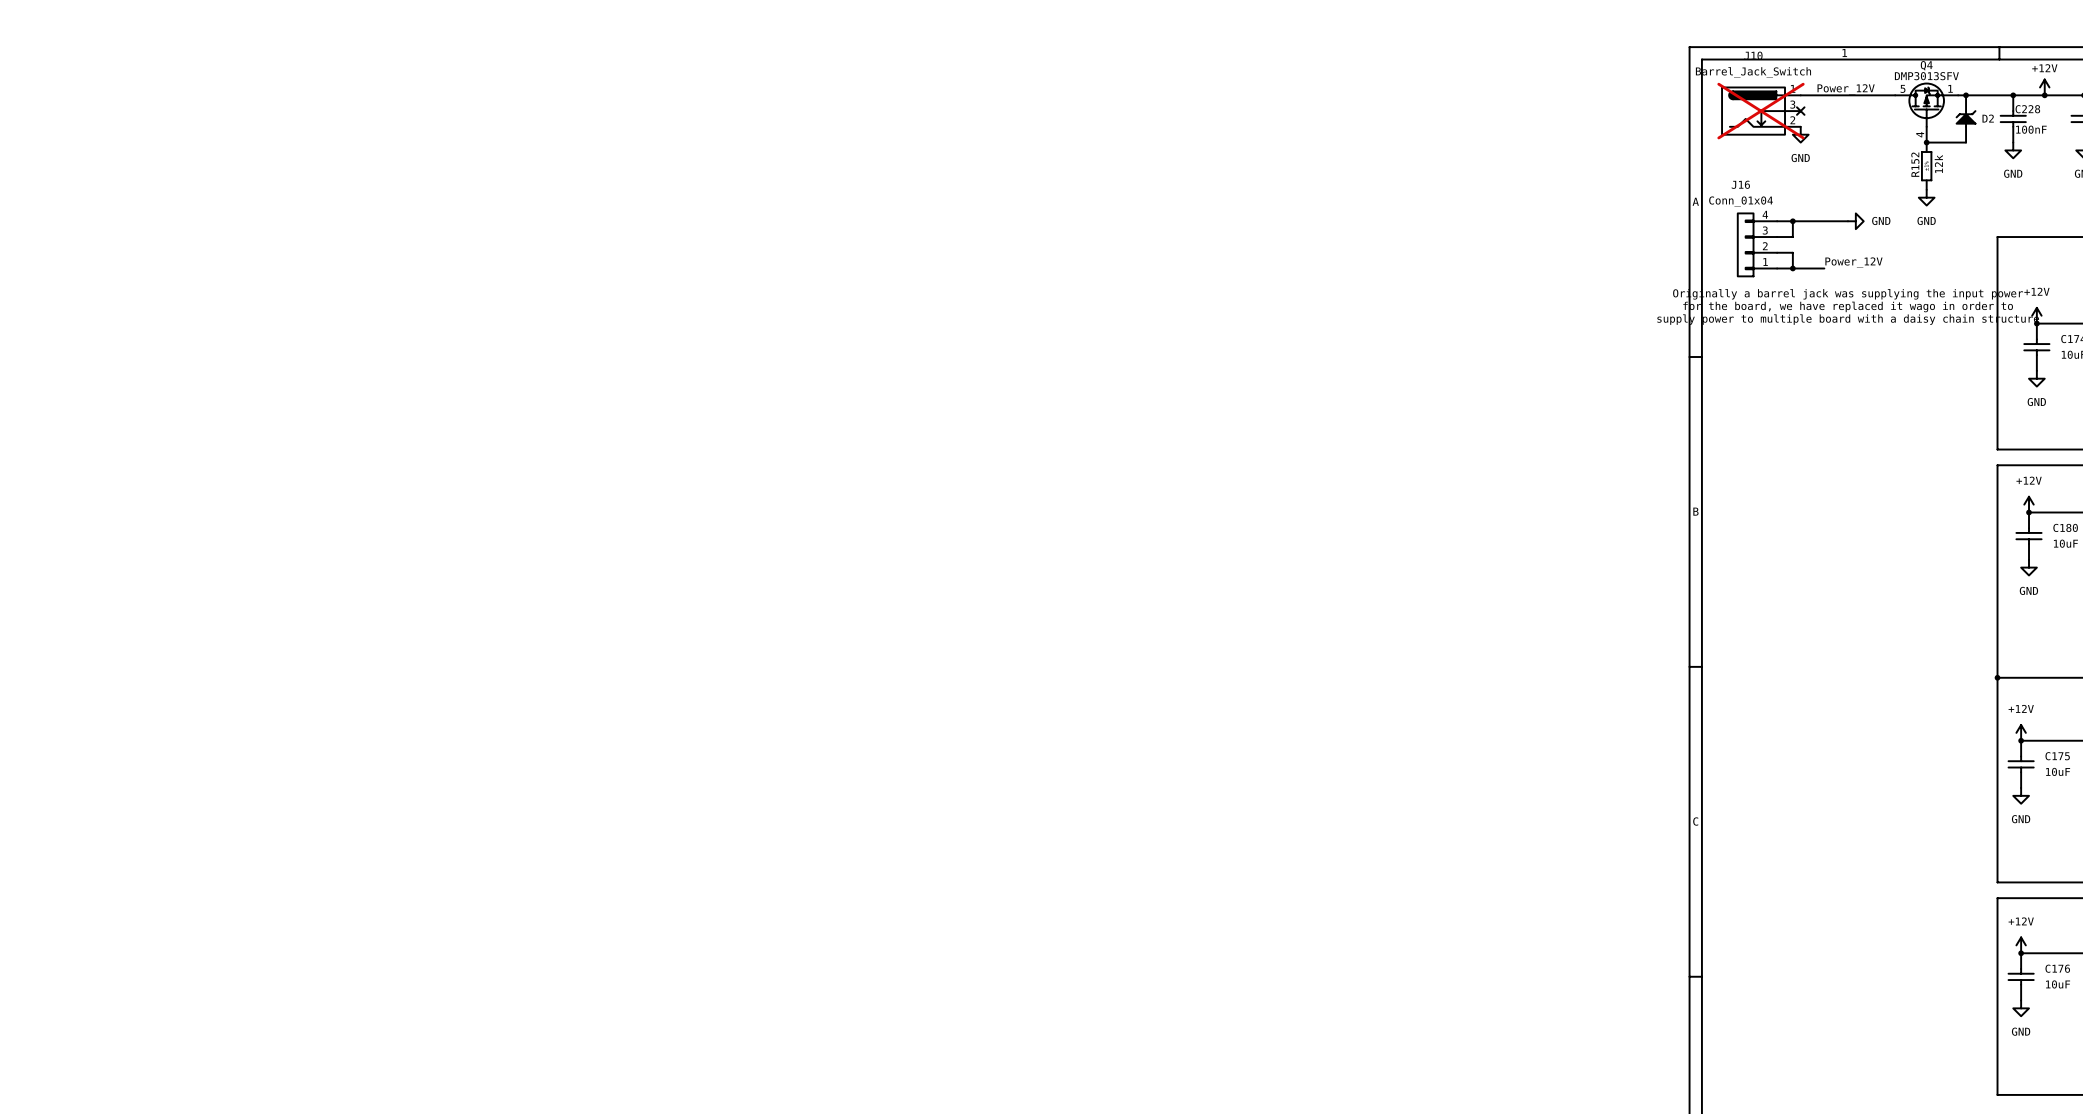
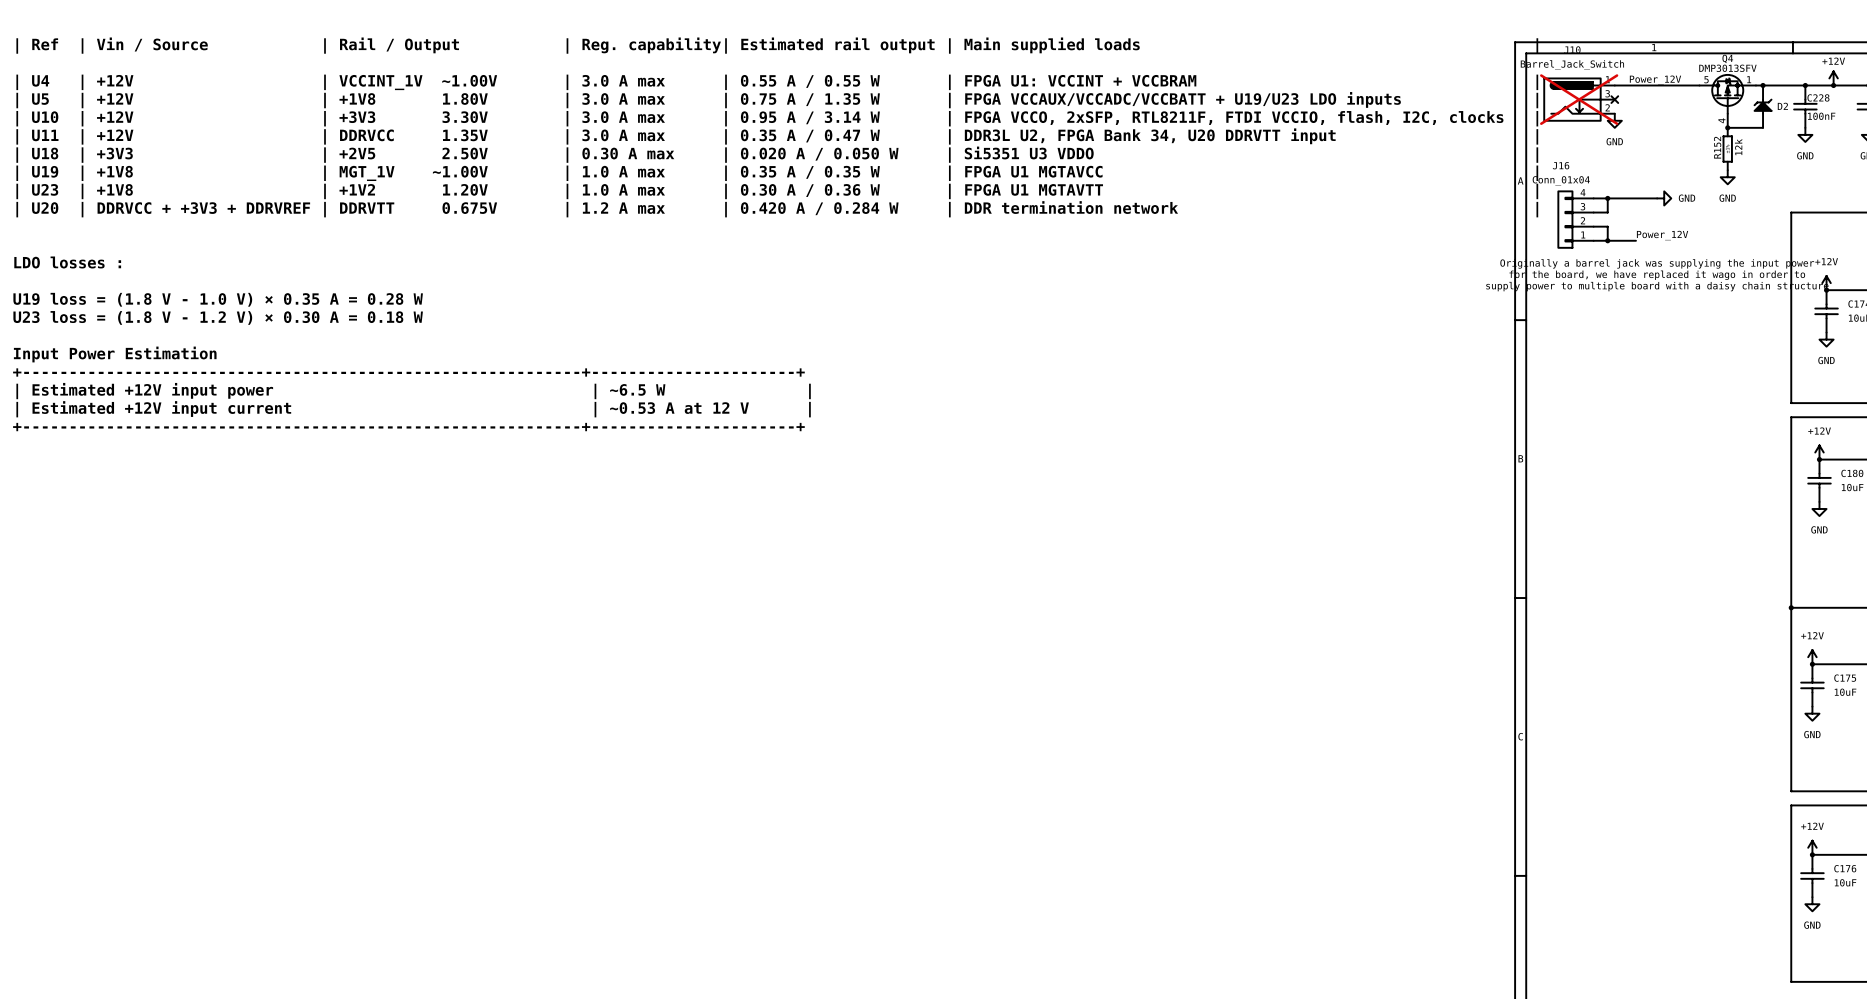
text: none -> | Ref | Vin / Source | Rail / Output | Reg. capability| Estimated rail output | Main supplied loads | (777, 45)
text: none -> | U4 | +12V | VCCINT_1V ~1.00V | 3.0 A max | 0.55 A / 0.55 W | FPGA U1: VCCINT + VCCBRAM | (777, 82)
text: none -> | U5 | +12V | +1V8 1.80V | 3.0 A max | 0.75 A / 1.35 W | FPGA VCCAUX/VCCADC/VCCBATT + U19/U23 LDO inputs | (777, 100)
text: none -> | U10 | +12V | +3V3 3.30V | 3.0 A max | 0.95 A / 3.14 W | FPGA VCCO, 2xSFP, RTL8211F, FTDI VCCIO, flash, I2C, clocks | (777, 118)
text: none -> | U11 | +12V | DDRVCC 1.35V | 3.0 A max | 0.35 A / 0.47 W | DDR3L U2, FPGA Bank 34, U20 DDRVTT input | (777, 136)
text: none -> | U18 | +3V3 | +2V5 2.50V | 0.30 A max | 0.020 A / 0.050 W | Si5351 U3 VDDO | (777, 154)
text: none -> | U19 | +1V8 | MGT_1V ~1.00V | 1.0 A max | 0.35 A / 0.35 W | FPGA U1 MGTAVCC | (777, 173)
text: none -> | U23 | +1V8 | +1V2 1.20V | 1.0 A max | 0.30 A / 0.36 W | FPGA U1 MGTAVTT | (777, 191)
text: none -> | U20 | DDRVCC + +3V3 + DDRVREF | DDRVTT 0.675V | 1.2 A max | 0.420 A / 0.284 W | DDR termination network | (777, 209)
text: none -> LDO losses : (67, 262)
text: none -> U19 loss = (1.8 V - 1.0 V) × 0.35 A = 0.28 W (218, 299)
text: none -> U23 loss = (1.8 V - 1.2 V) × 0.30 A = 0.18 W (218, 317)
text: none -> Input Power Estimation (115, 354)
text: none -> +------------------------------------------------------------+----------------------+ (408, 372)
text: none -> | Estimated +12V input power | ~6.5 W | (413, 391)
text: none -> | Estimated +12V input current | ~0.53 A at 12 V | (413, 409)
text: none -> +------------------------------------------------------------+----------------------+ (408, 427)

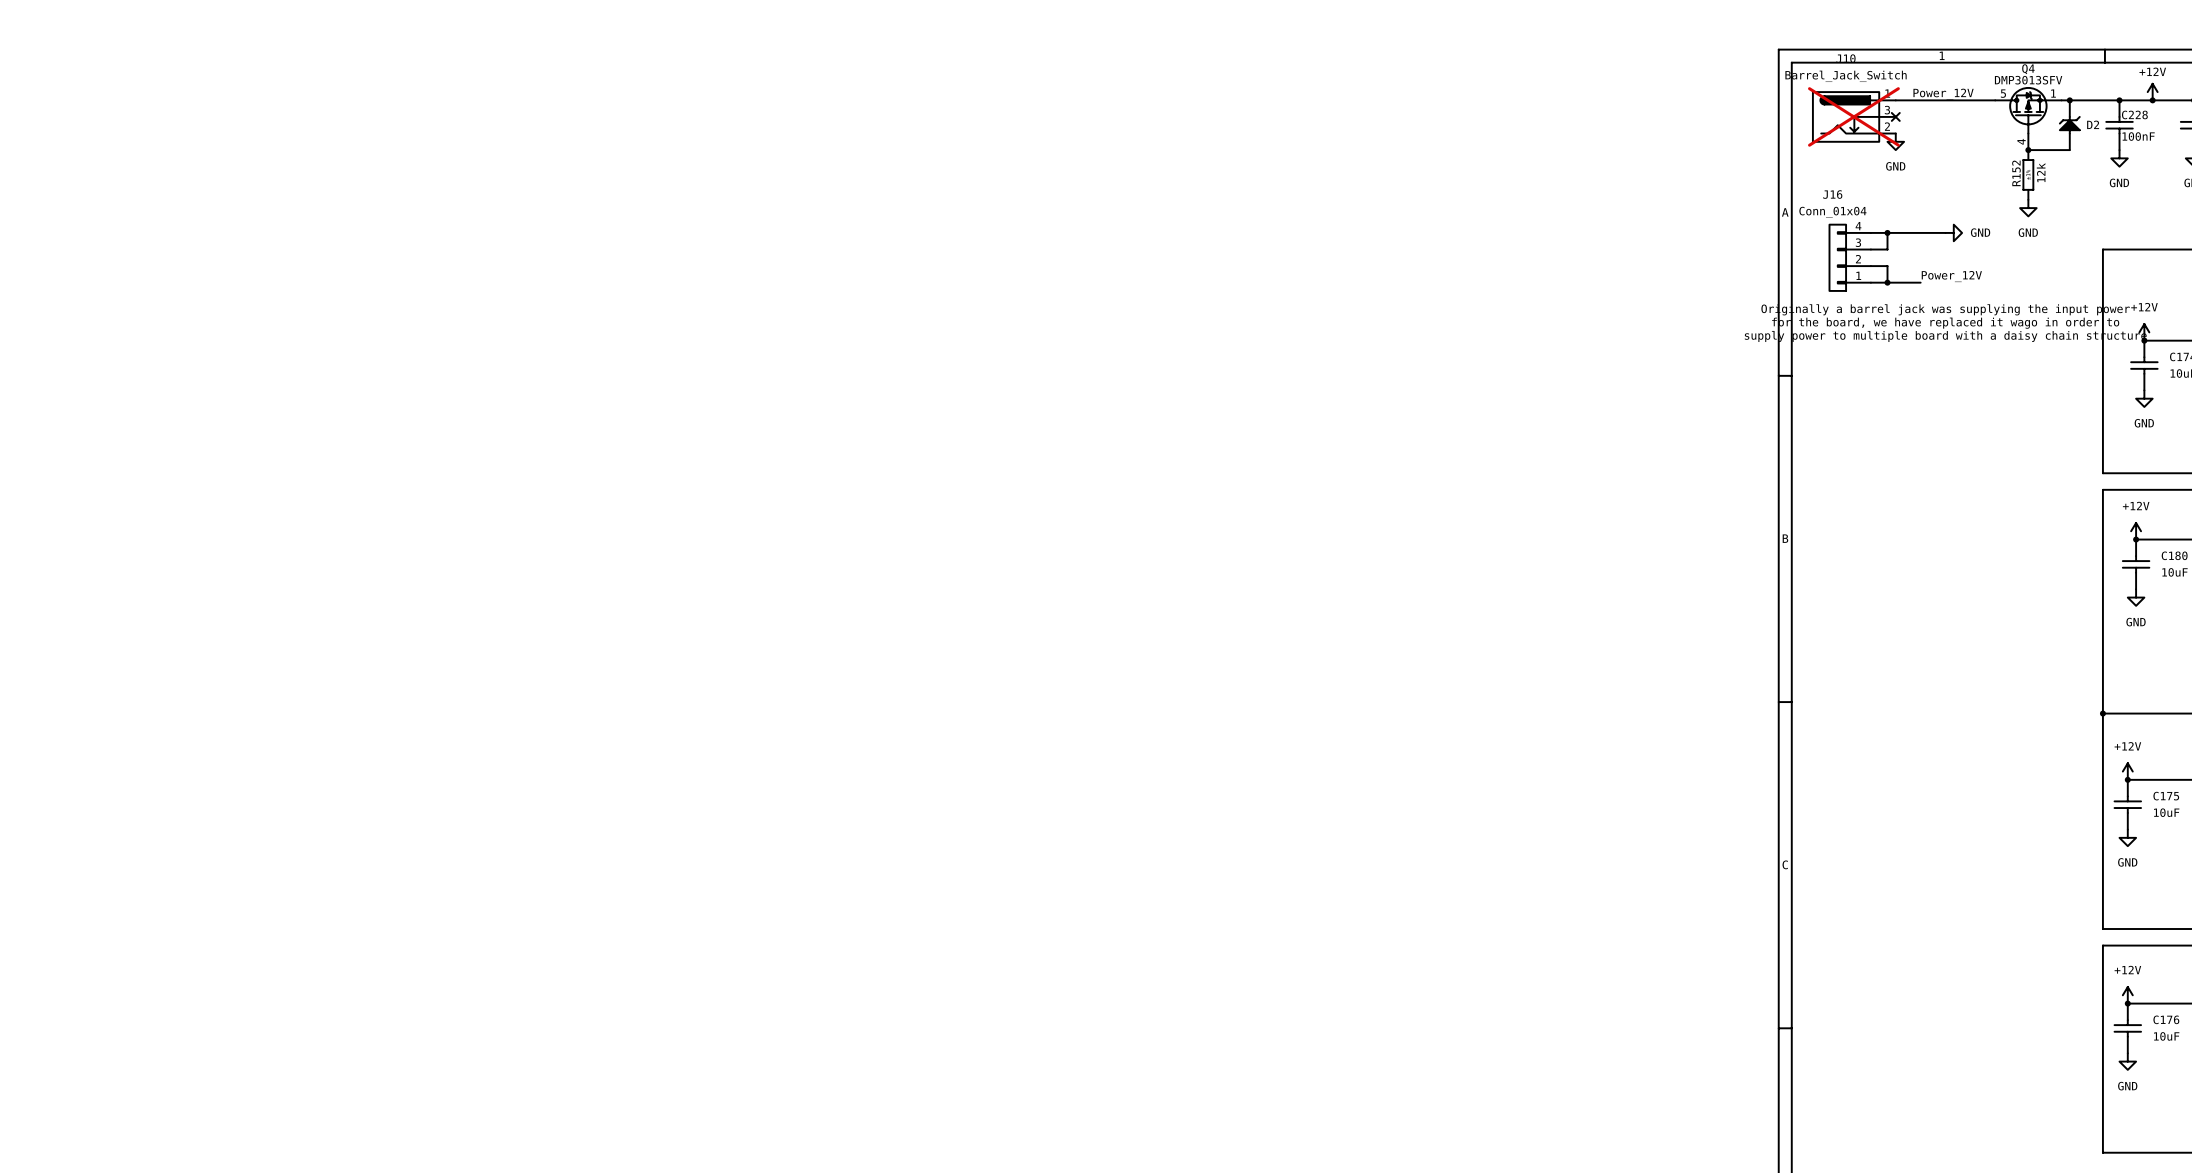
text: | Ref | Vin / Source | Rail / Output | Reg. capability| Estimated rail output | Main supplied loads | (777, 45) -> none
text: | U4 | +12V | VCCINT_1V ~1.00V | 3.0 A max | 0.55 A / 0.55 W | FPGA U1: VCCINT + VCCBRAM | (777, 82) -> none
text: | U5 | +12V | +1V8 1.80V | 3.0 A max | 0.75 A / 1.35 W | FPGA VCCAUX/VCCADC/VCCBATT + U19/U23 LDO inputs | (777, 100) -> none
text: | U10 | +12V | +3V3 3.30V | 3.0 A max | 0.95 A / 3.14 W | FPGA VCCO, 2xSFP, RTL8211F, FTDI VCCIO, flash, I2C, clocks | (777, 118) -> none
text: | U11 | +12V | DDRVCC 1.35V | 3.0 A max | 0.35 A / 0.47 W | DDR3L U2, FPGA Bank 34, U20 DDRVTT input | (777, 136) -> none
text: | U18 | +3V3 | +2V5 2.50V | 0.30 A max | 0.020 A / 0.050 W | Si5351 U3 VDDO | (777, 154) -> none
text: | U19 | +1V8 | MGT_1V ~1.00V | 1.0 A max | 0.35 A / 0.35 W | FPGA U1 MGTAVCC | (777, 173) -> none
text: | U23 | +1V8 | +1V2 1.20V | 1.0 A max | 0.30 A / 0.36 W | FPGA U1 MGTAVTT | (777, 191) -> none
text: | U20 | DDRVCC + +3V3 + DDRVREF | DDRVTT 0.675V | 1.2 A max | 0.420 A / 0.284 W | DDR termination network | (777, 209) -> none
text: LDO losses : (67, 262) -> none
text: U19 loss = (1.8 V - 1.0 V) × 0.35 A = 0.28 W (218, 299) -> none
text: U23 loss = (1.8 V - 1.2 V) × 0.30 A = 0.18 W (218, 317) -> none
text: Input Power Estimation (115, 354) -> none
text: +------------------------------------------------------------+----------------------+ (408, 372) -> none
text: | Estimated +12V input power | ~6.5 W | (413, 391) -> none
text: | Estimated +12V input current | ~0.53 A at 12 V | (413, 409) -> none
text: +------------------------------------------------------------+----------------------+ (408, 427) -> none

